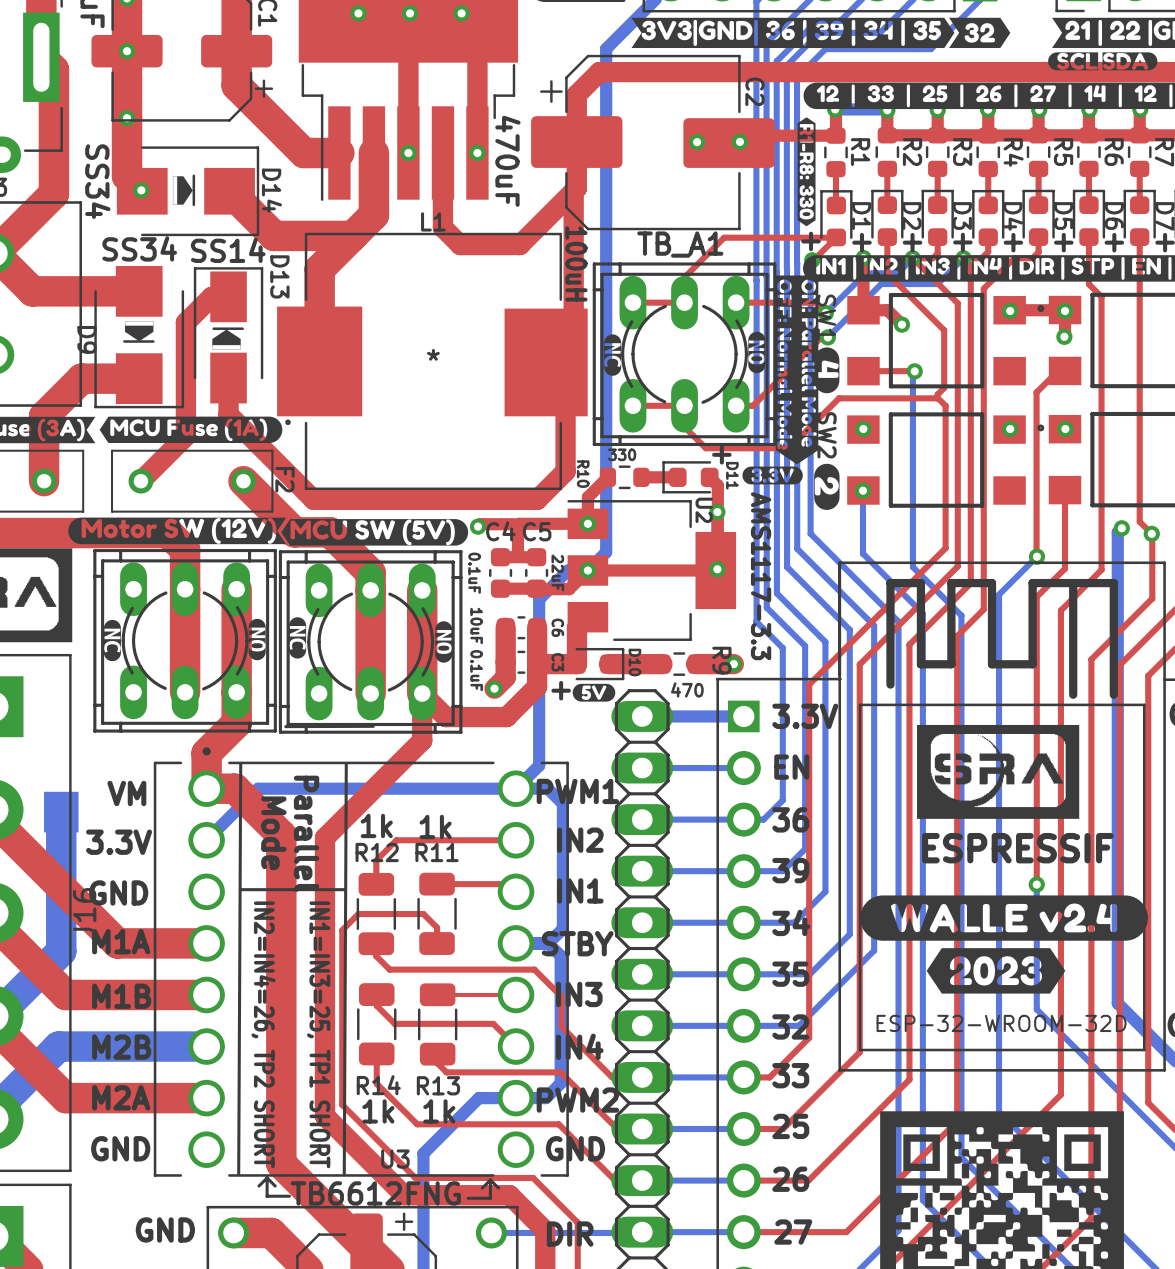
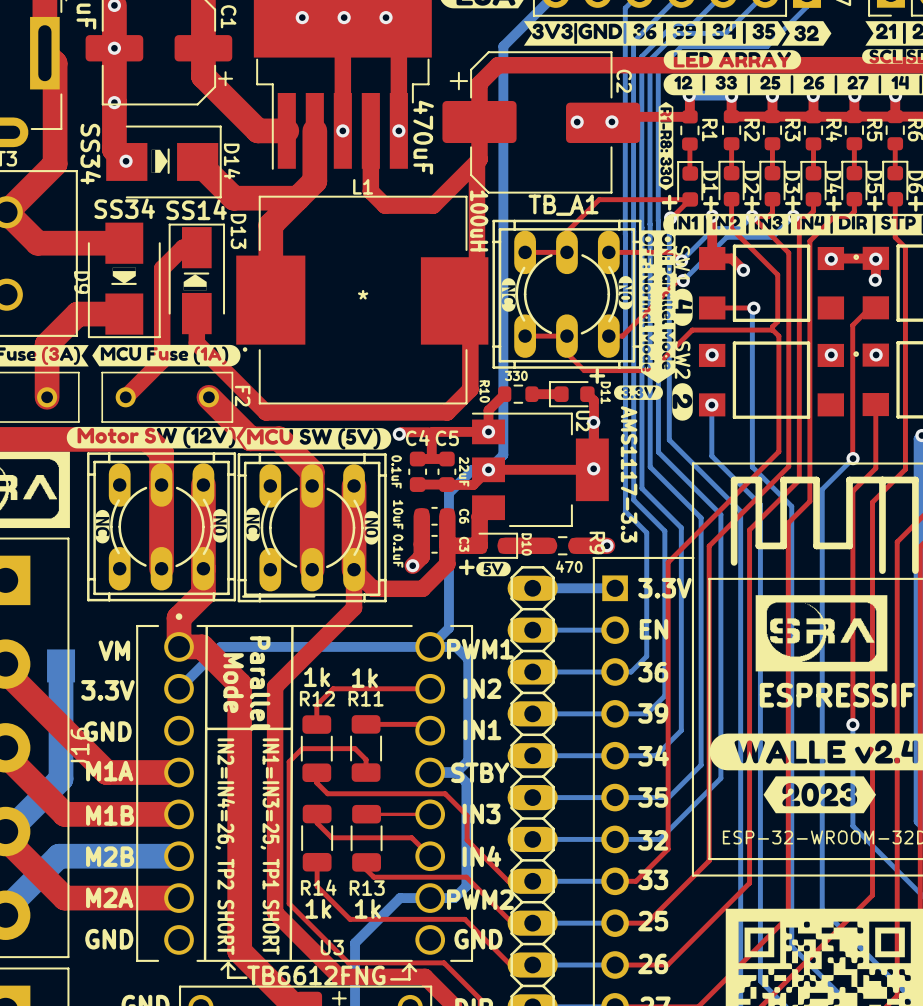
drawing: none -> [663, 50, 802, 70]

